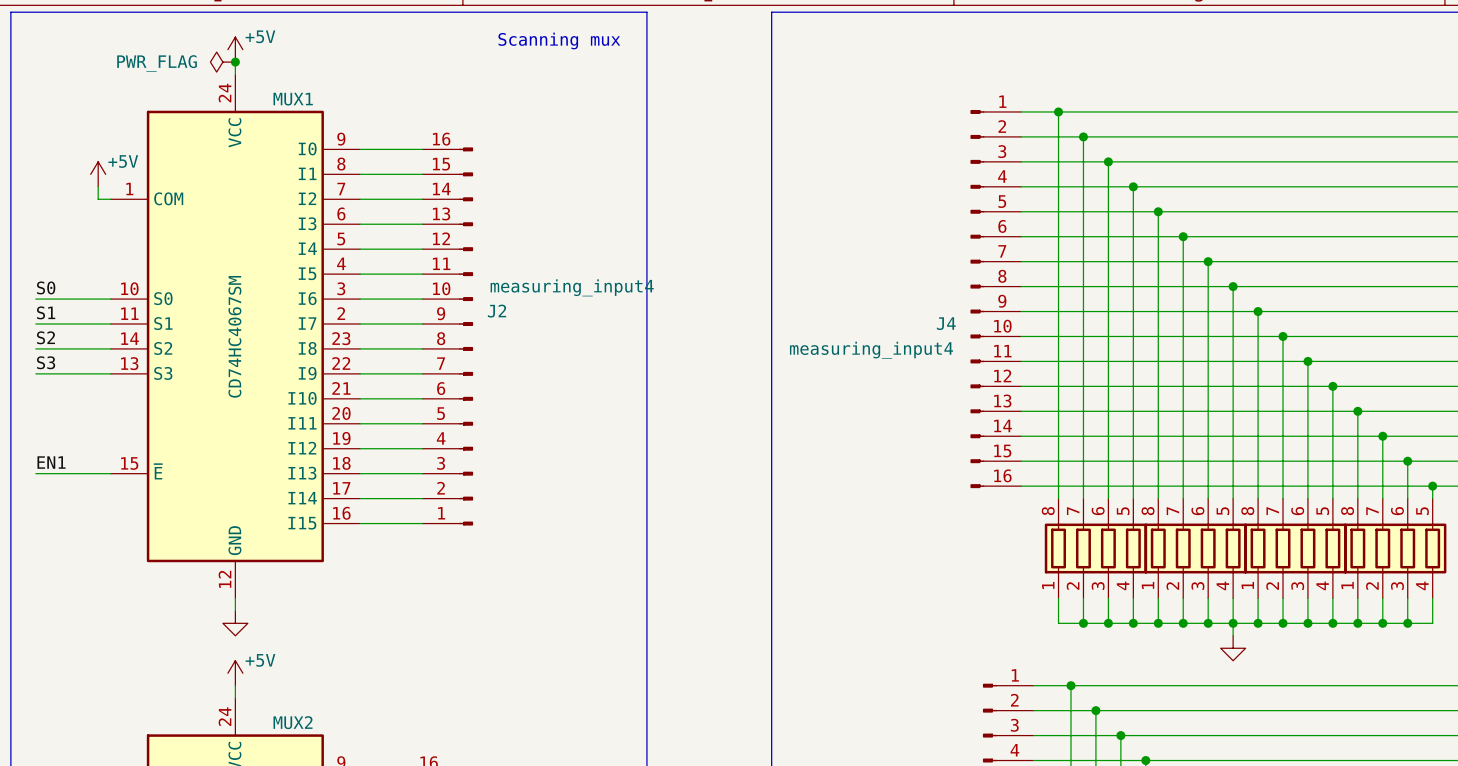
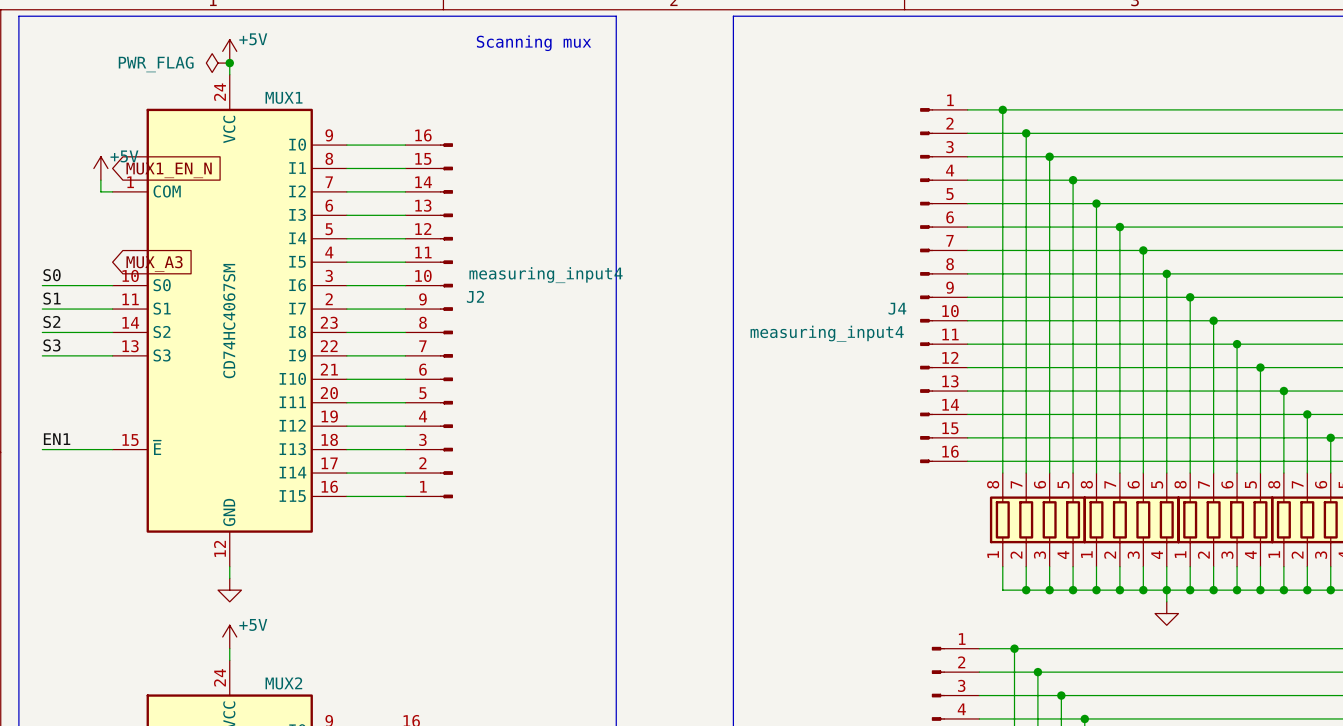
global label: none -> MUX1_EN_N (169, 170)
global label: none -> MUX_A3 (154, 263)

